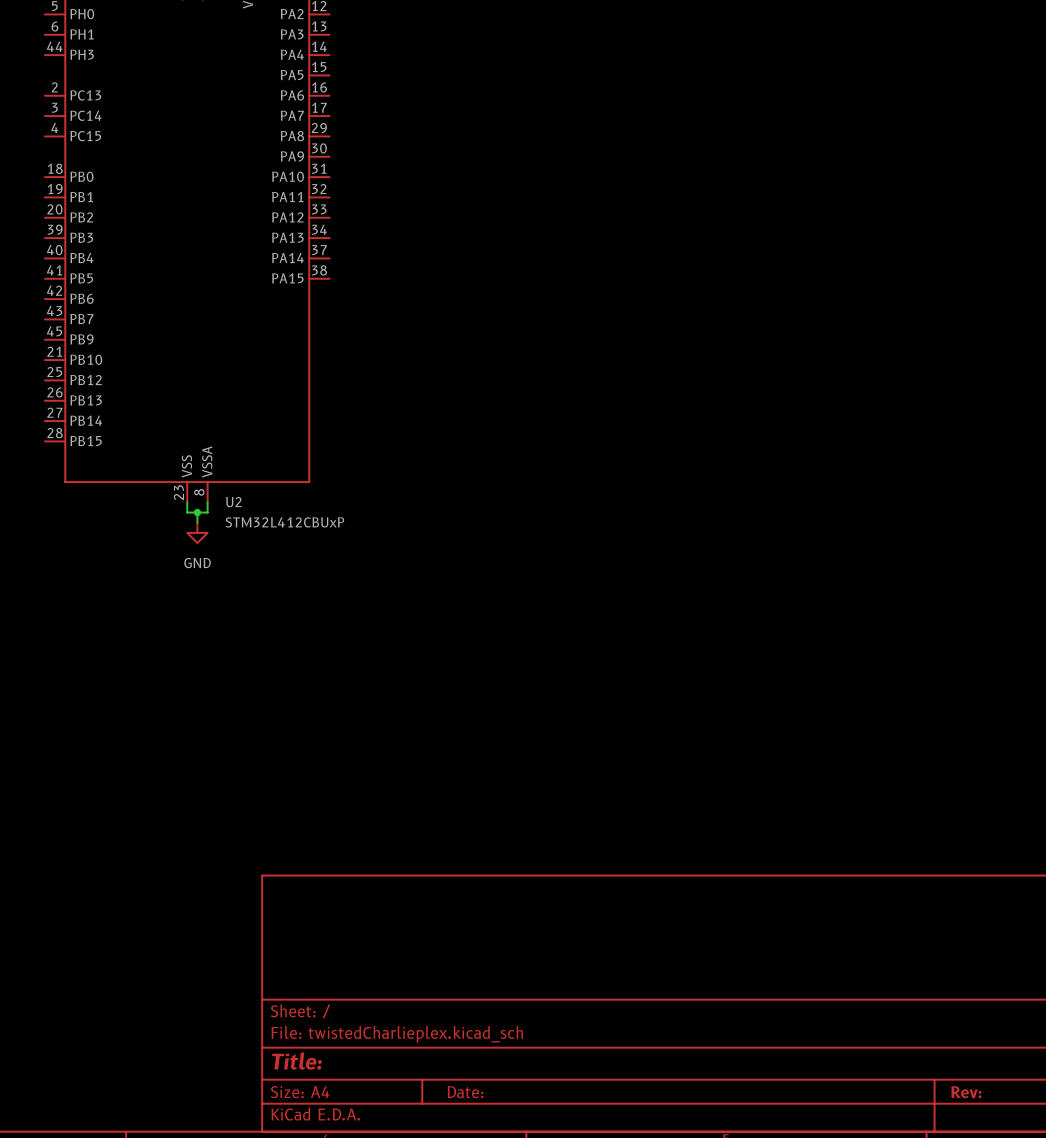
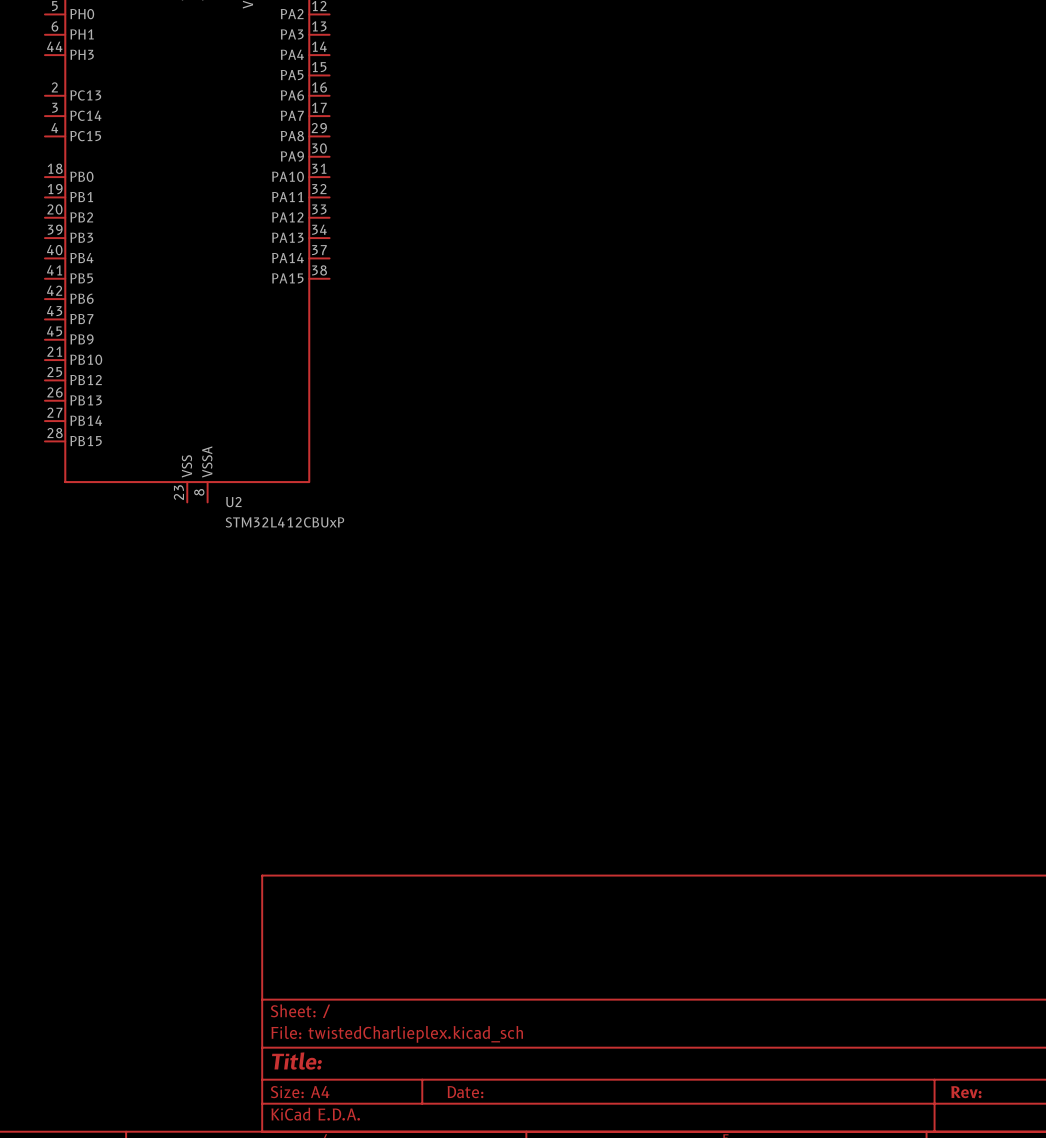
wire: (187, 502) (187, 512) (207, 512) (207, 502) -> none
wire: (197, 512) (197, 522) -> none
junction: (197, 512) -> none
power symbol: GND (197, 532) -> none

